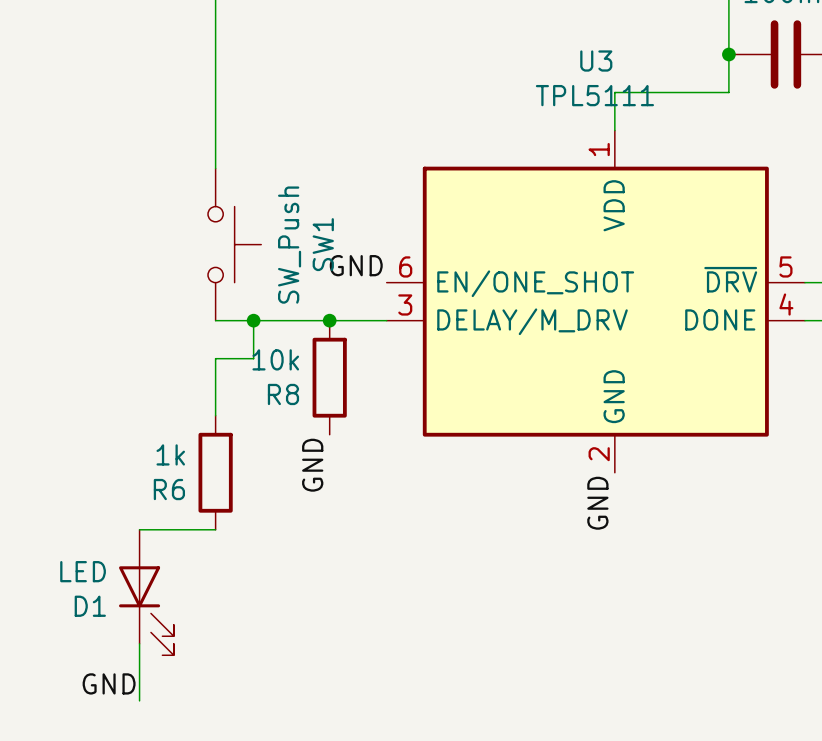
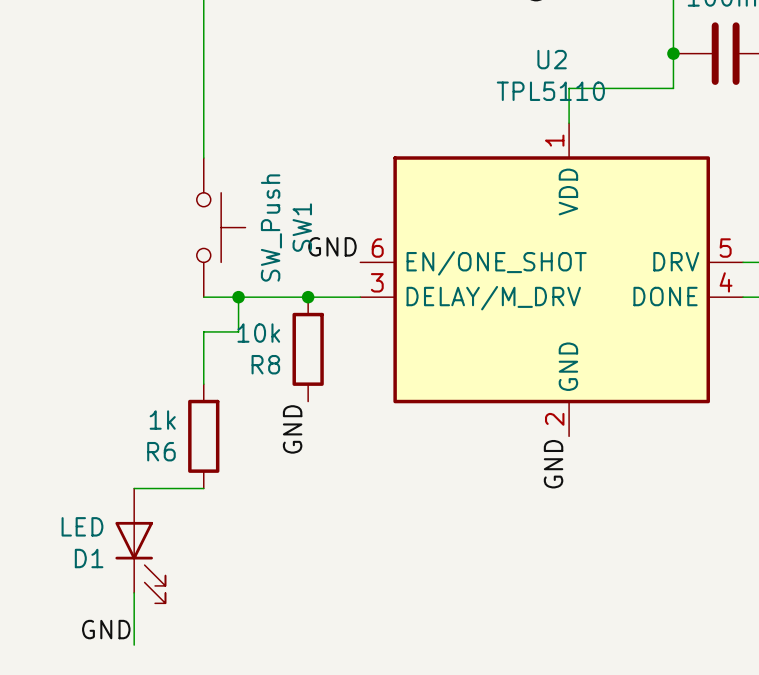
U3 name: U3 (596, 61) -> U2 (552, 59)
U3 value: TPL5111 (594, 95) -> TPL5110 (550, 91)
U3 pin name: ~{DRV} (730, 279) -> DRV (676, 261)

